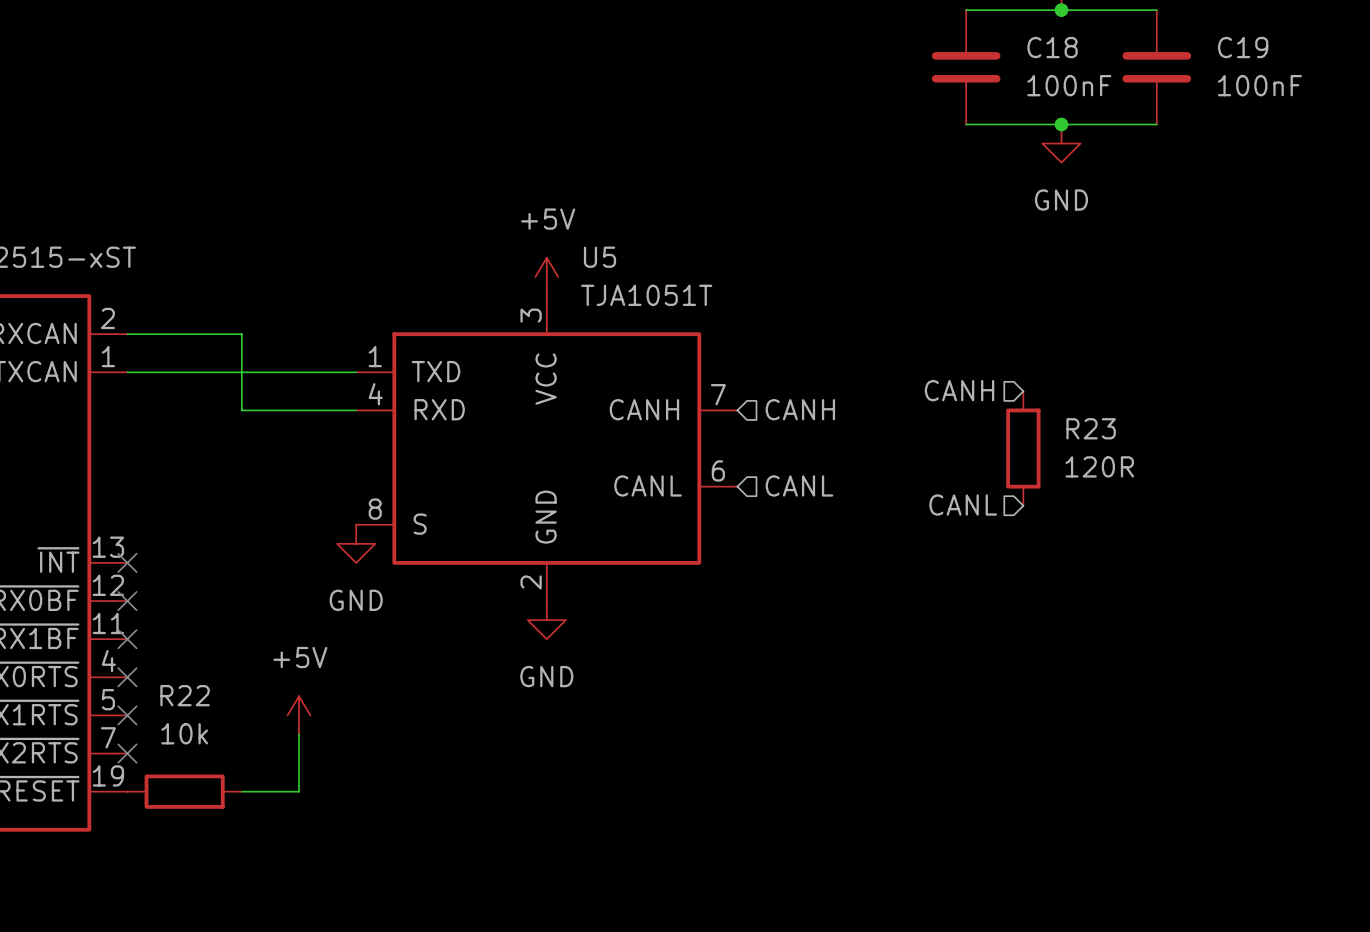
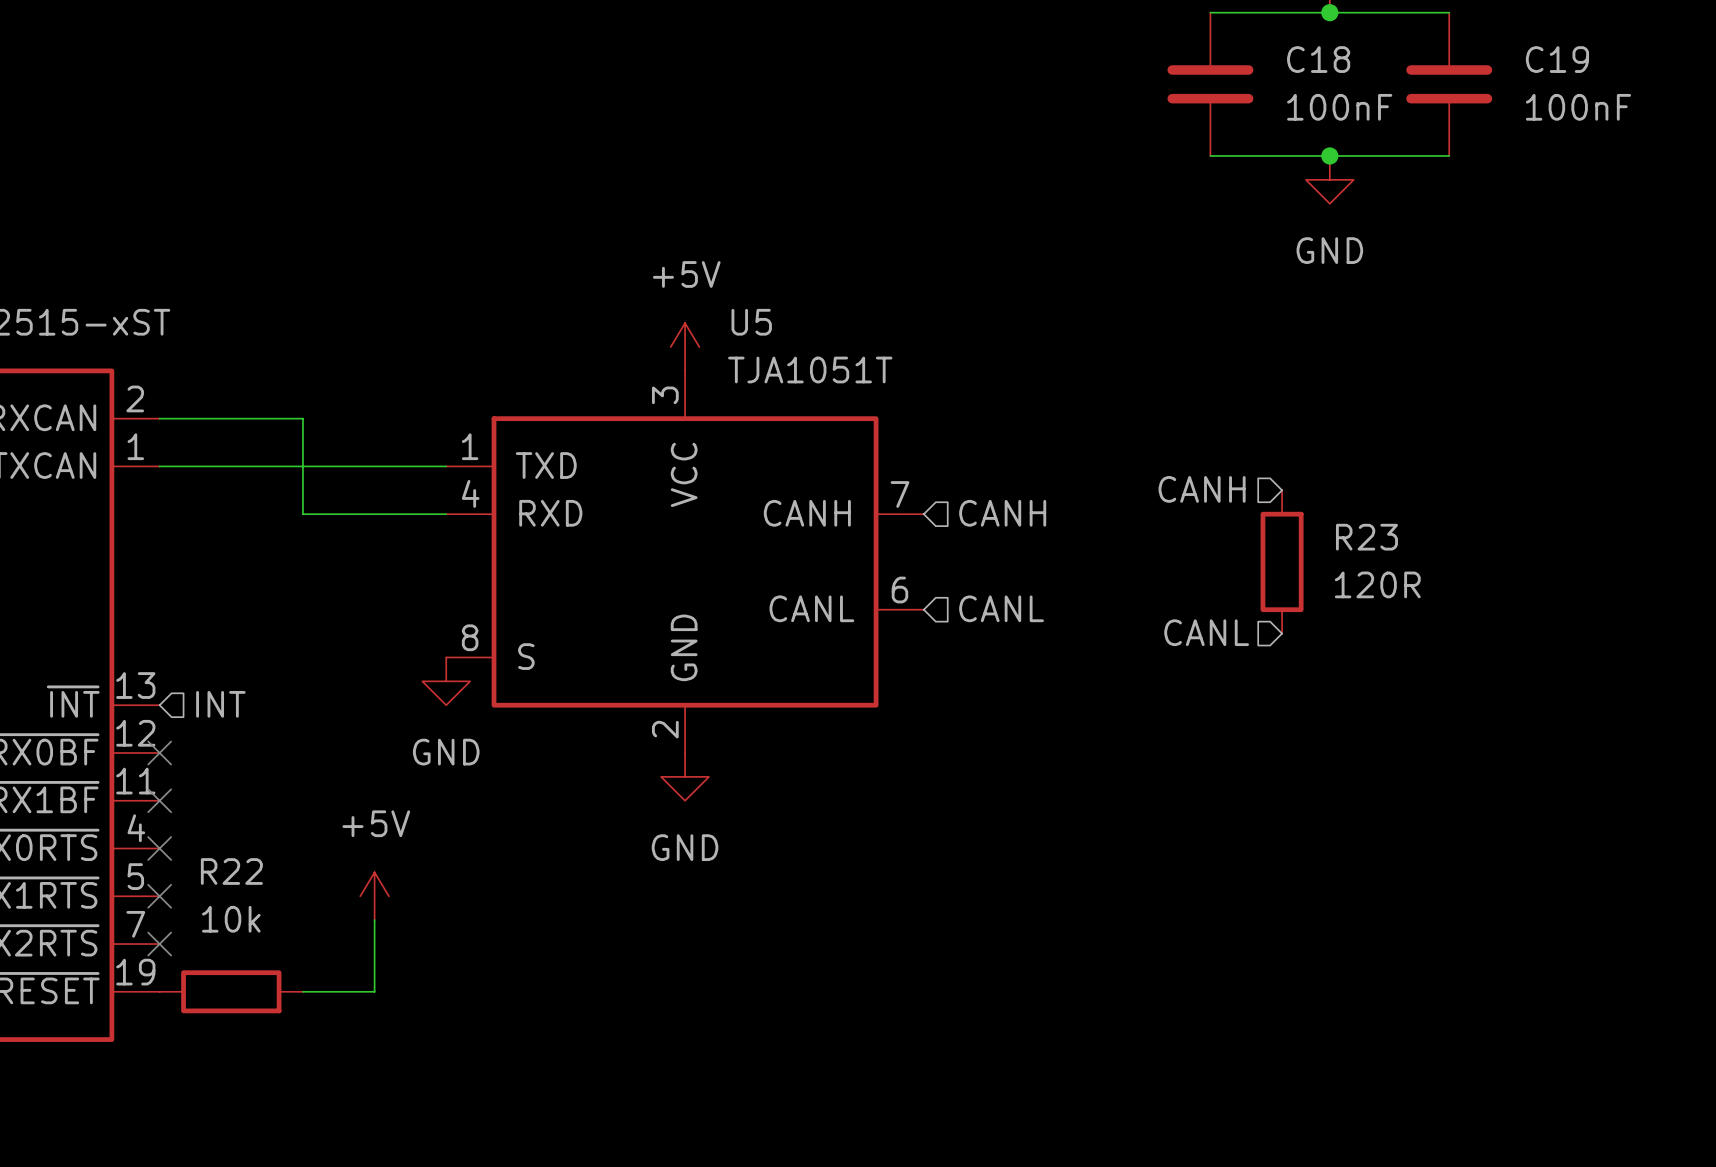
no-connect mark: (127, 562) -> none
hierarchical label: none -> INT (220, 704)

